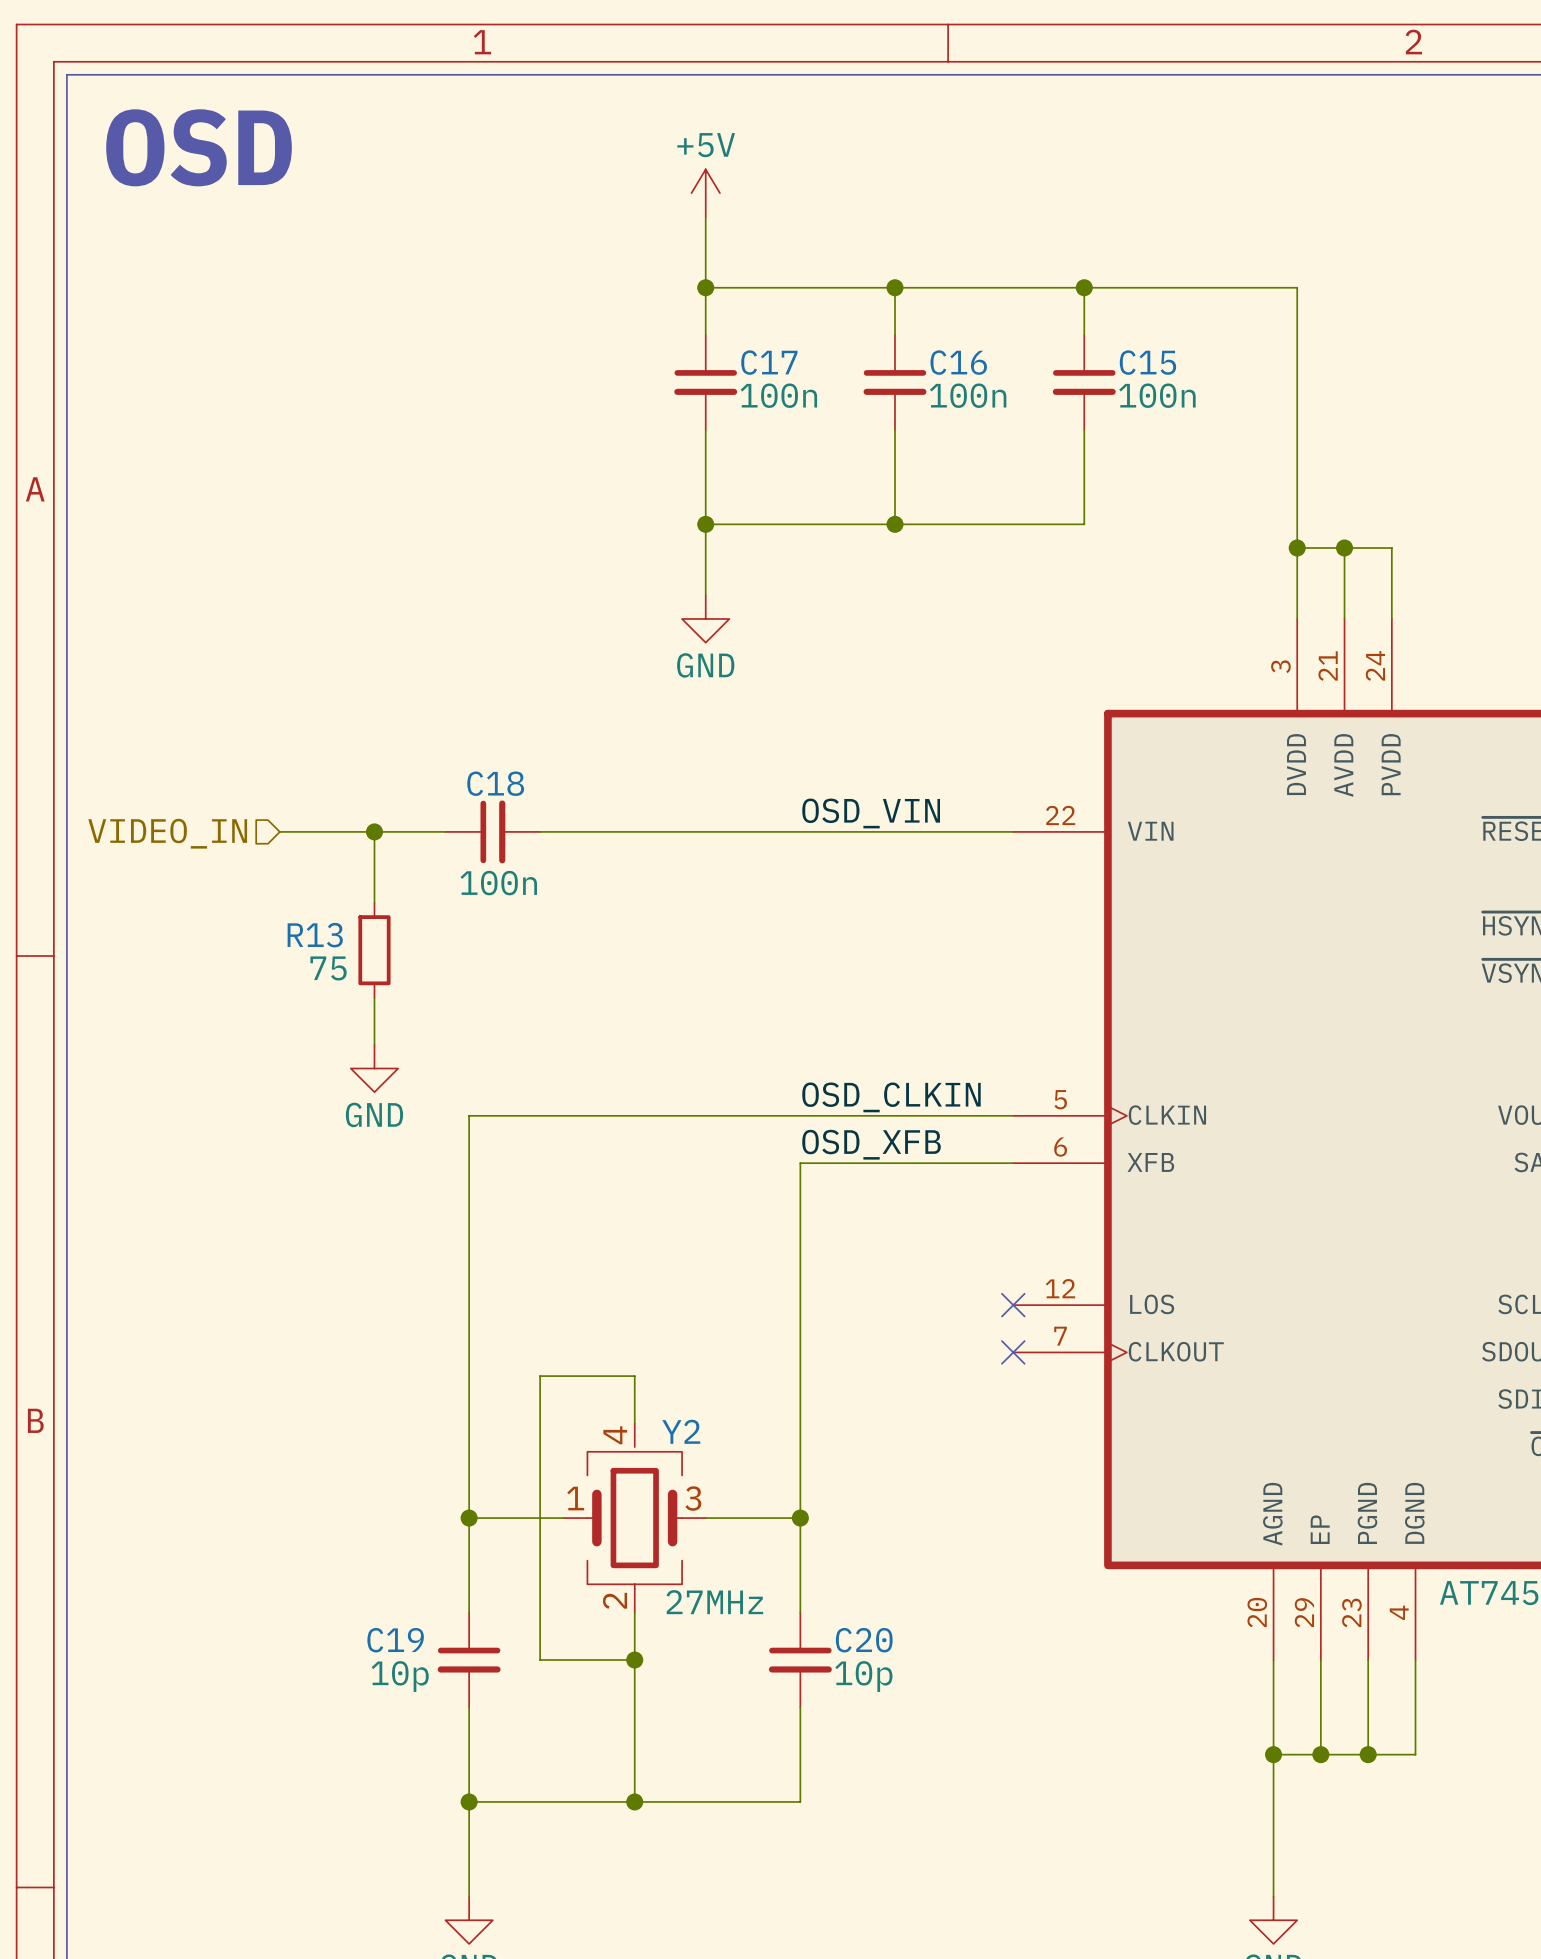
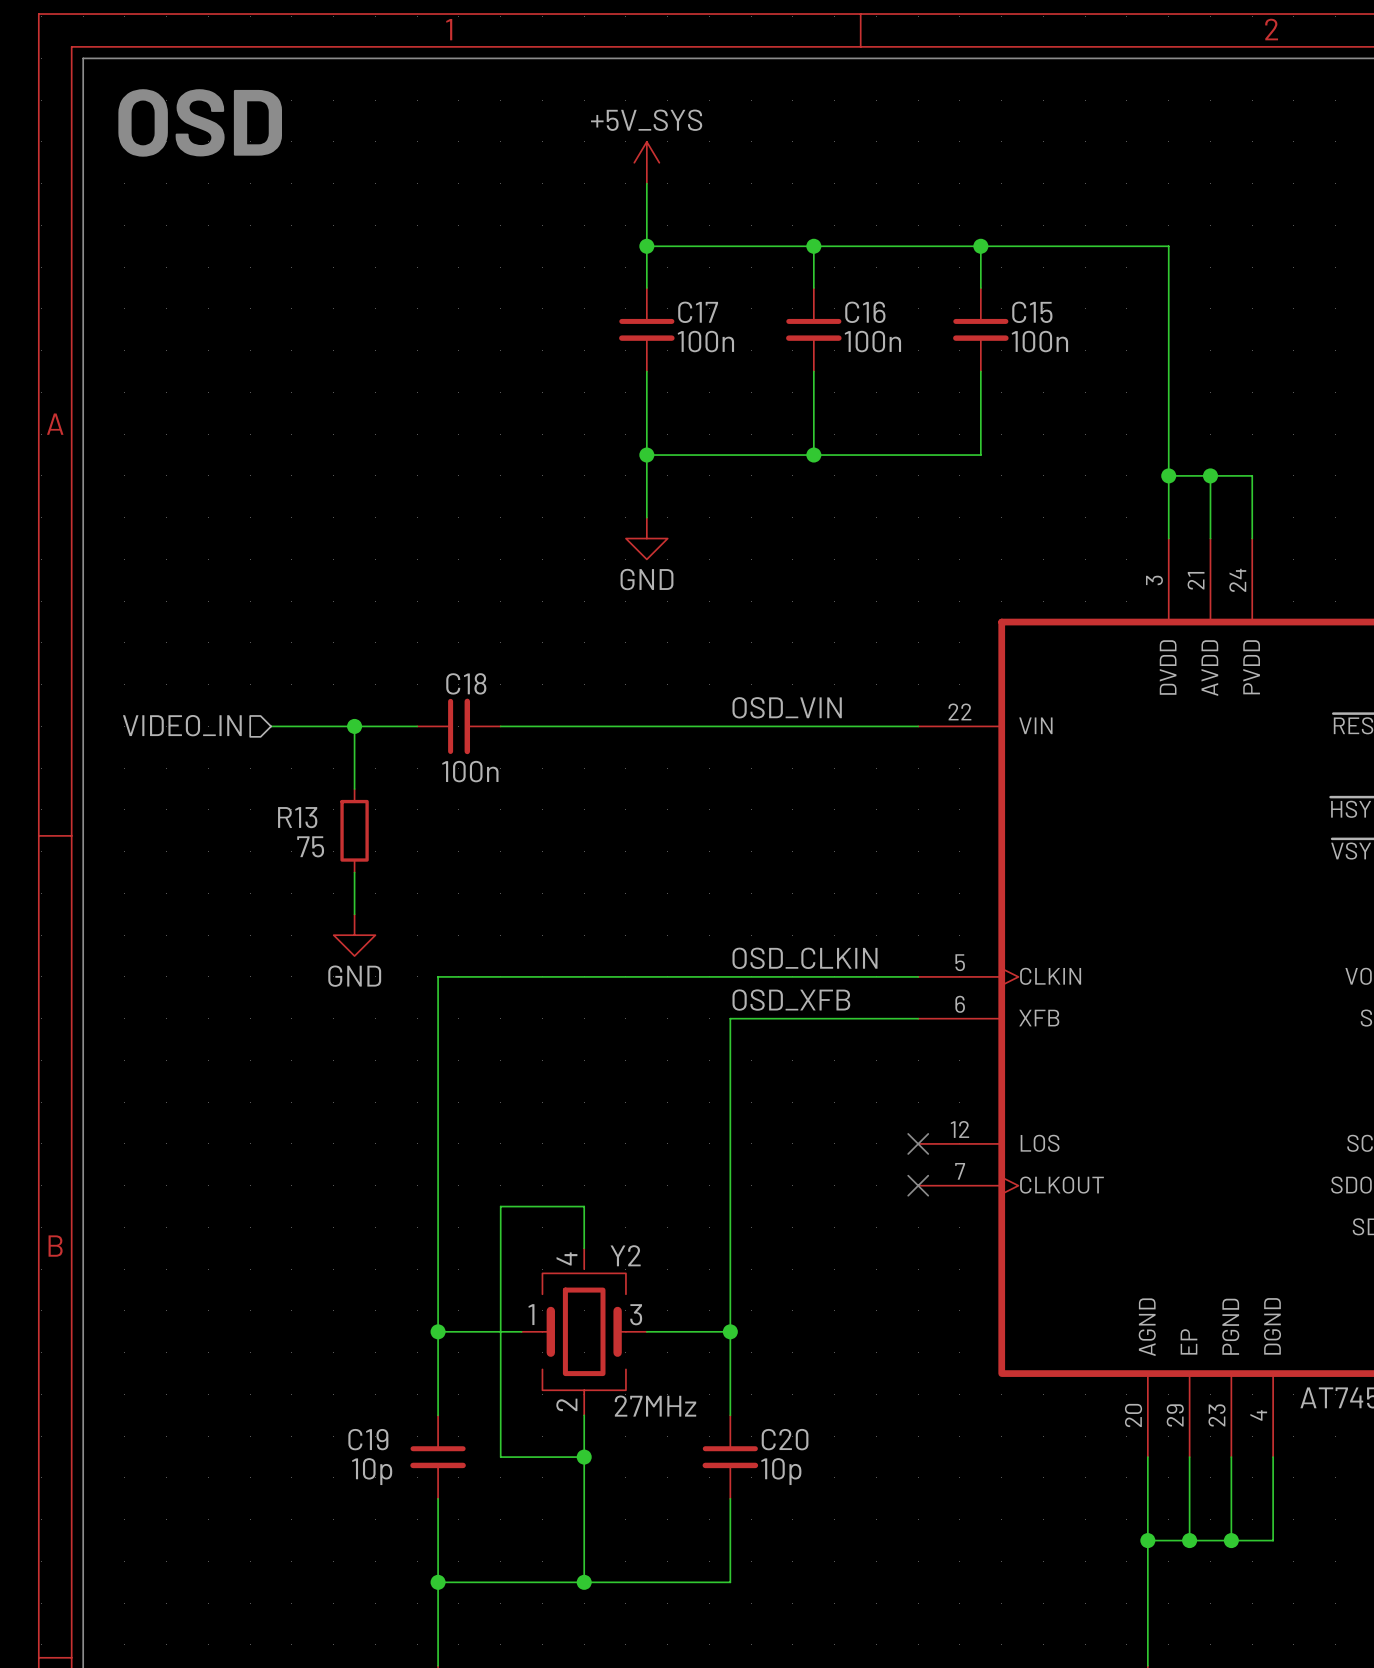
power symbol: +5V (705, 193) -> +5V_SYS (646, 162)

